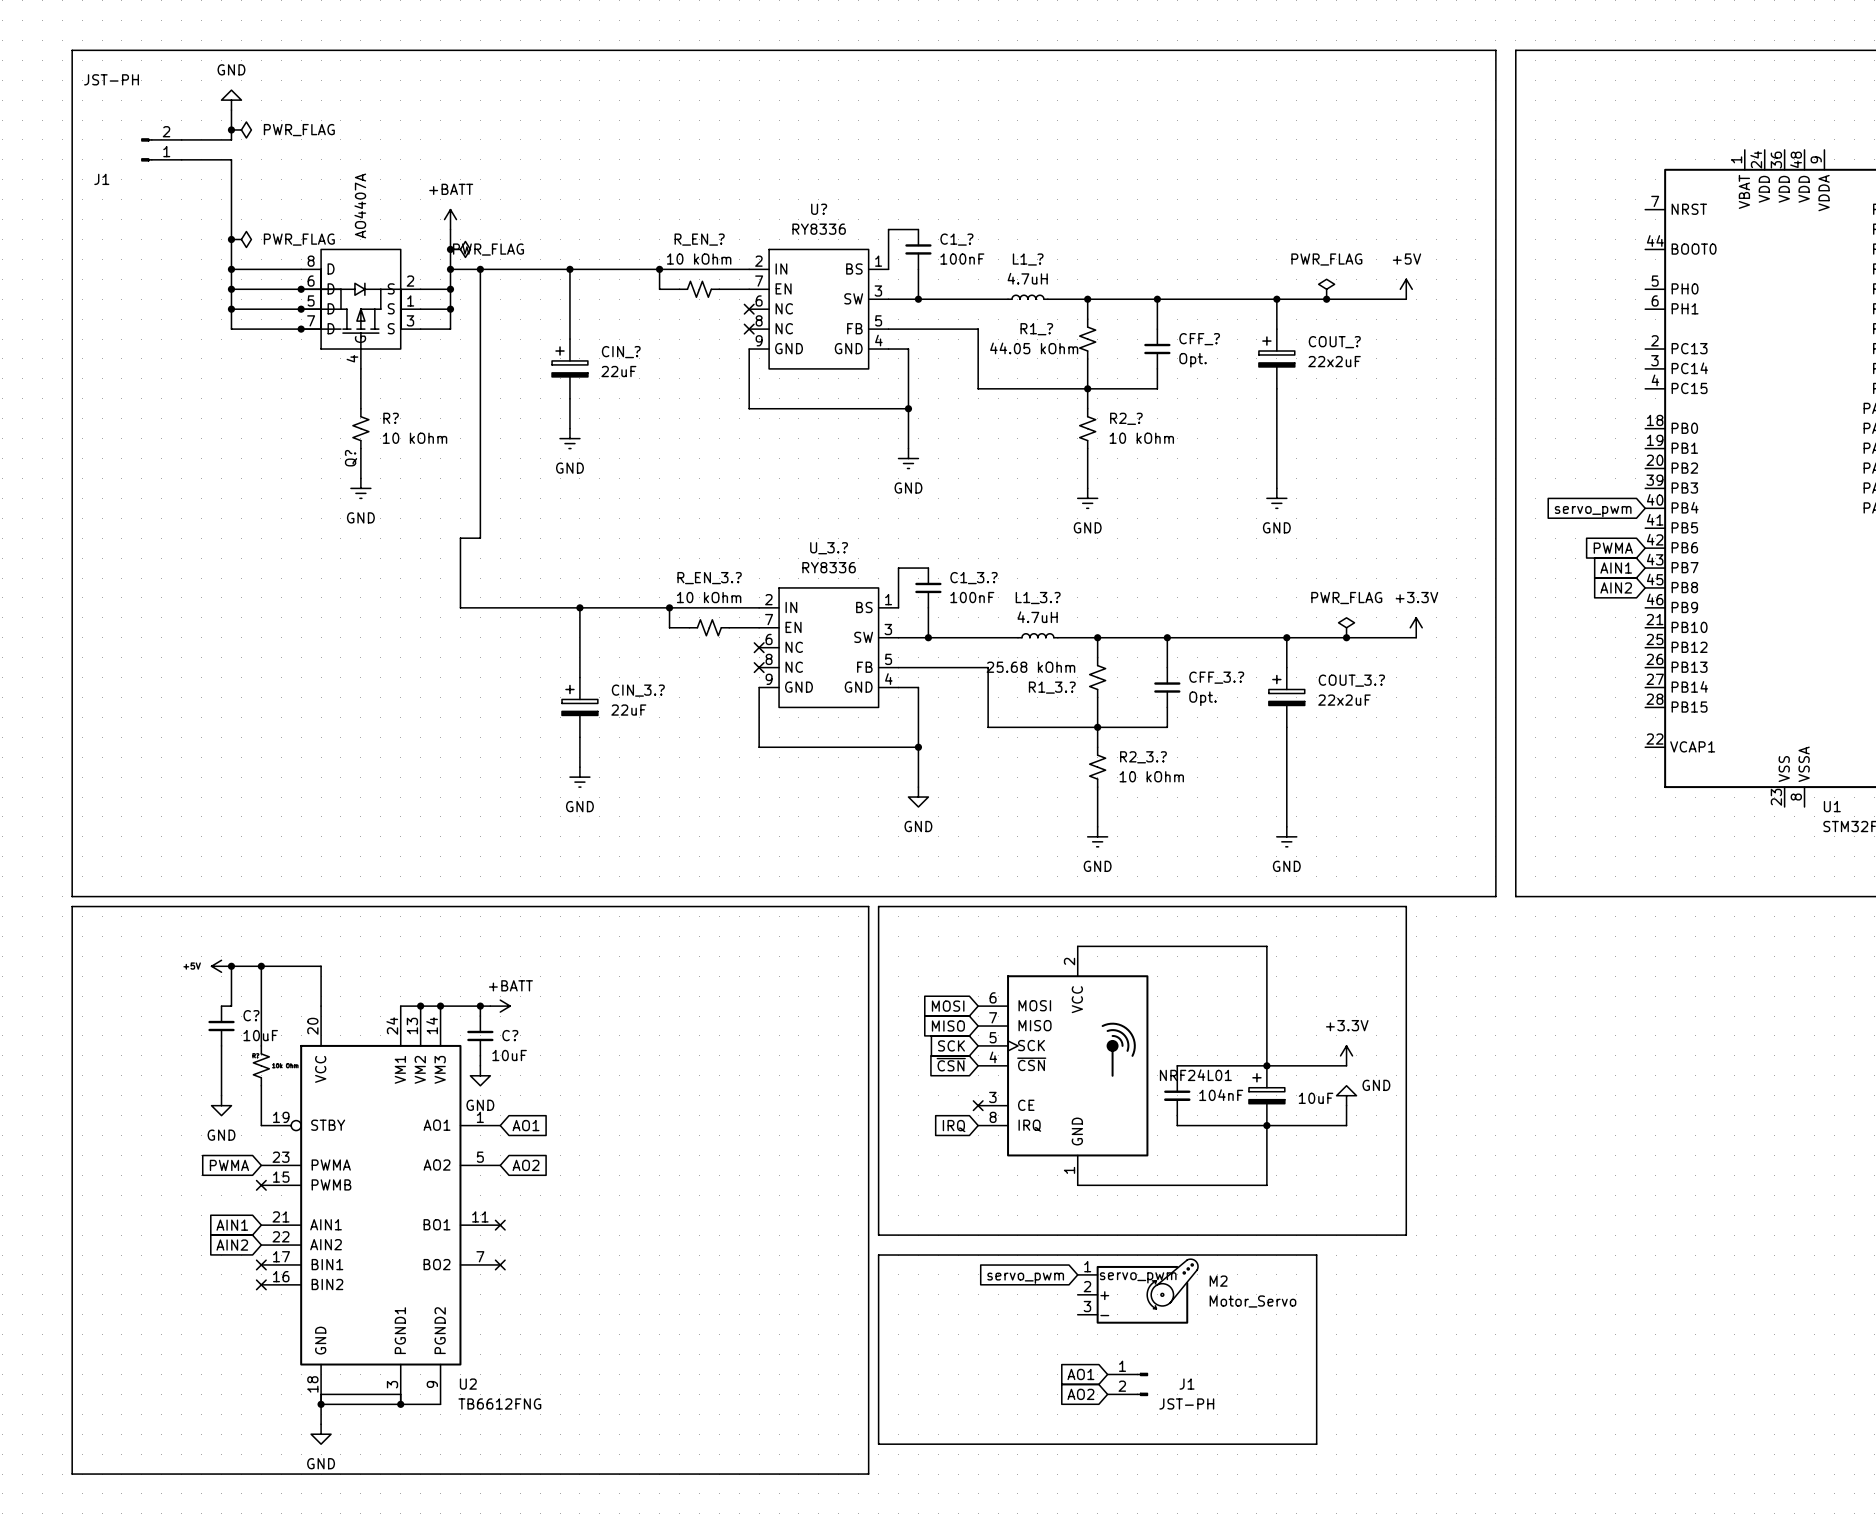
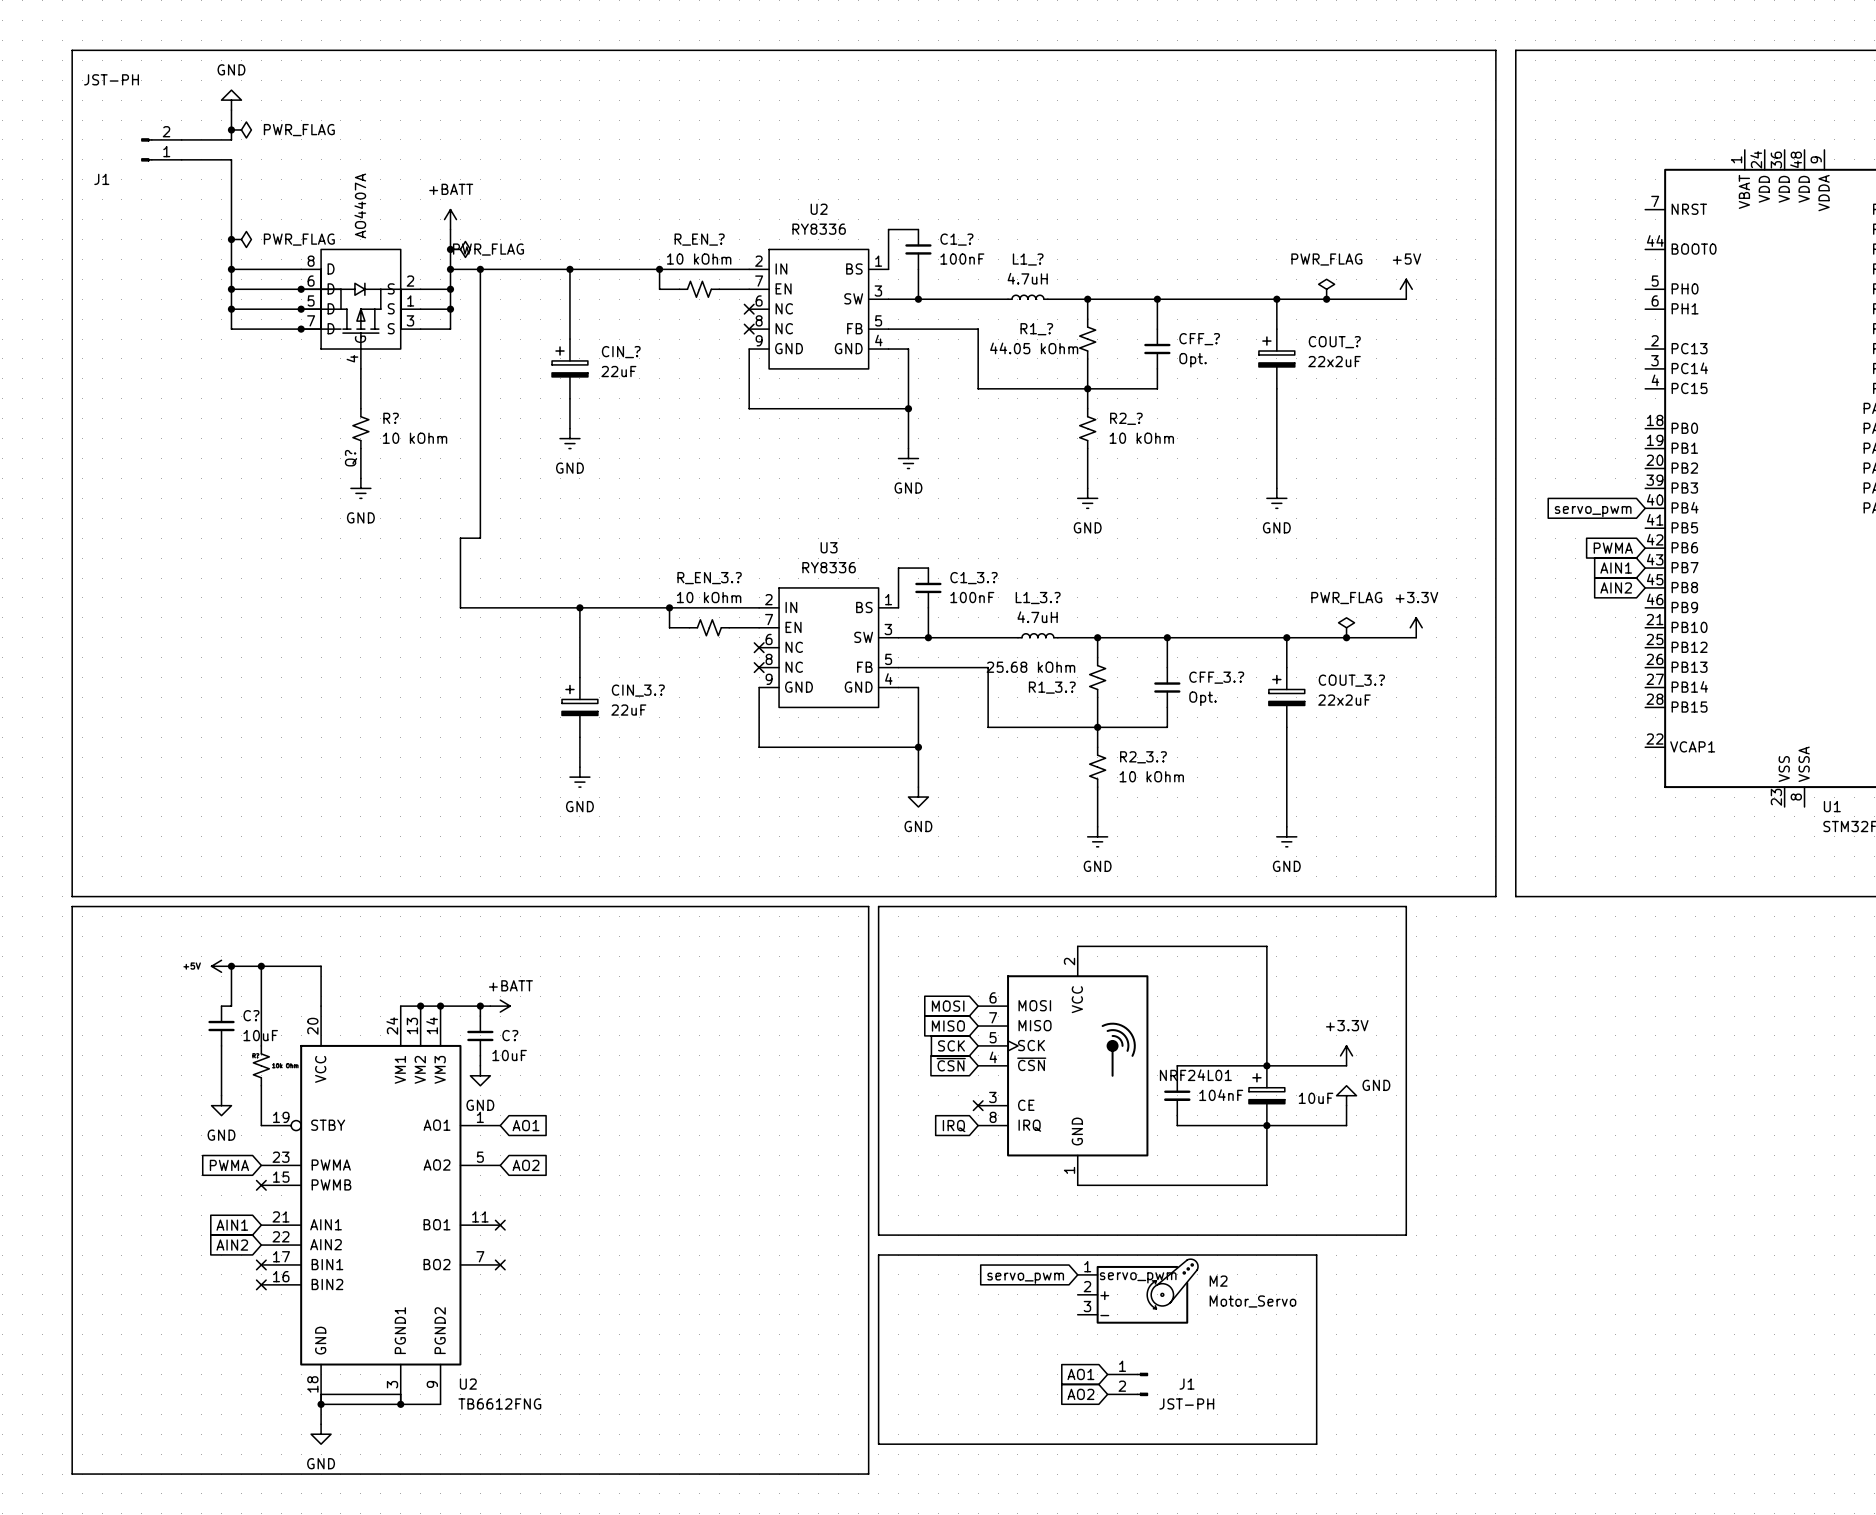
U? name: U? (819, 209) -> U2 (819, 209)
U_3.? name: U_3.? (829, 548) -> U3 (829, 547)

